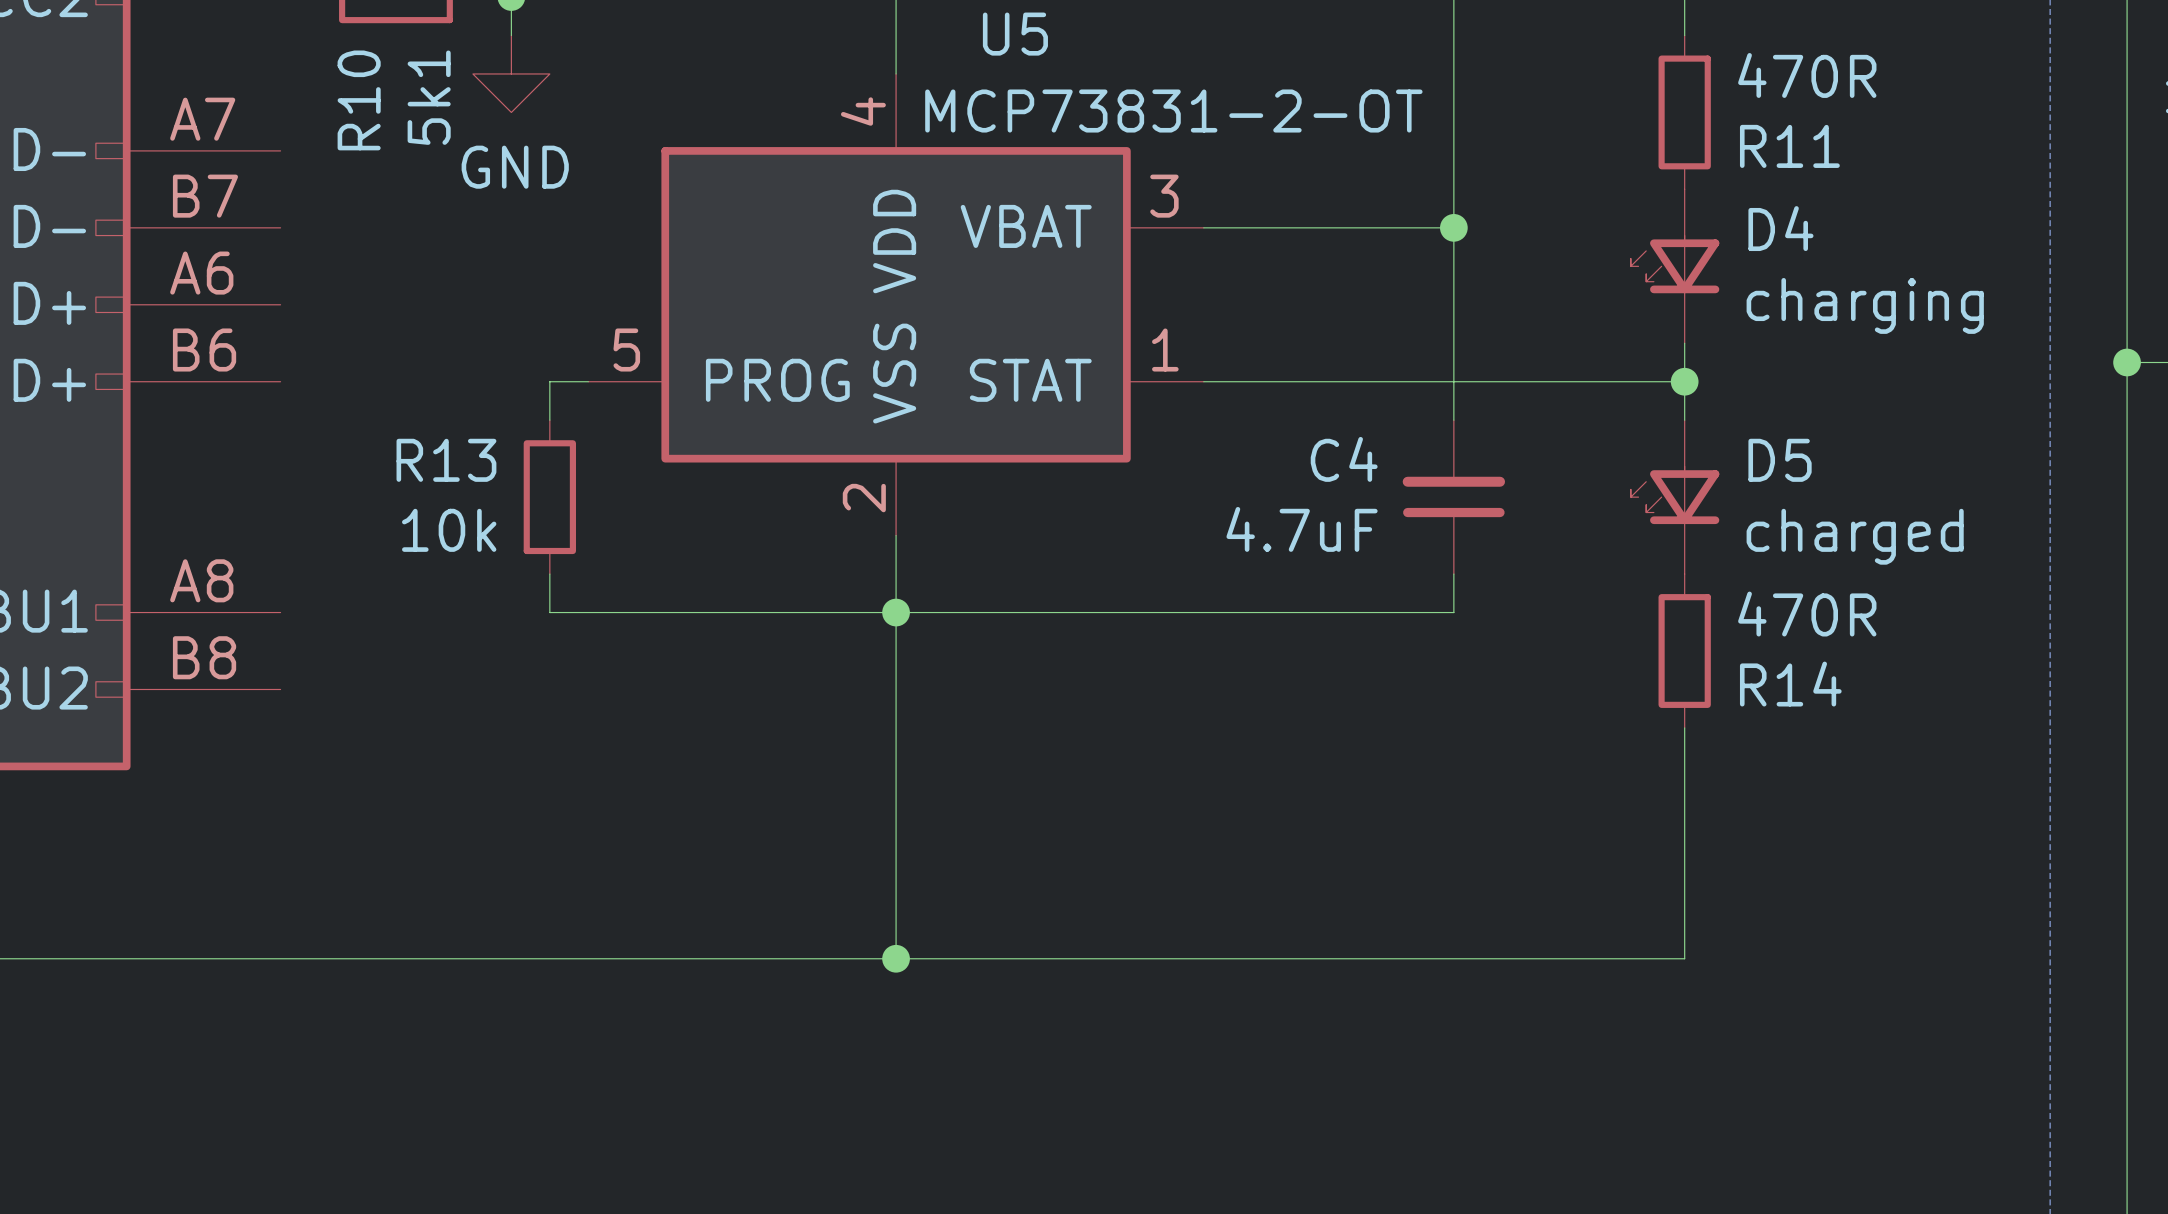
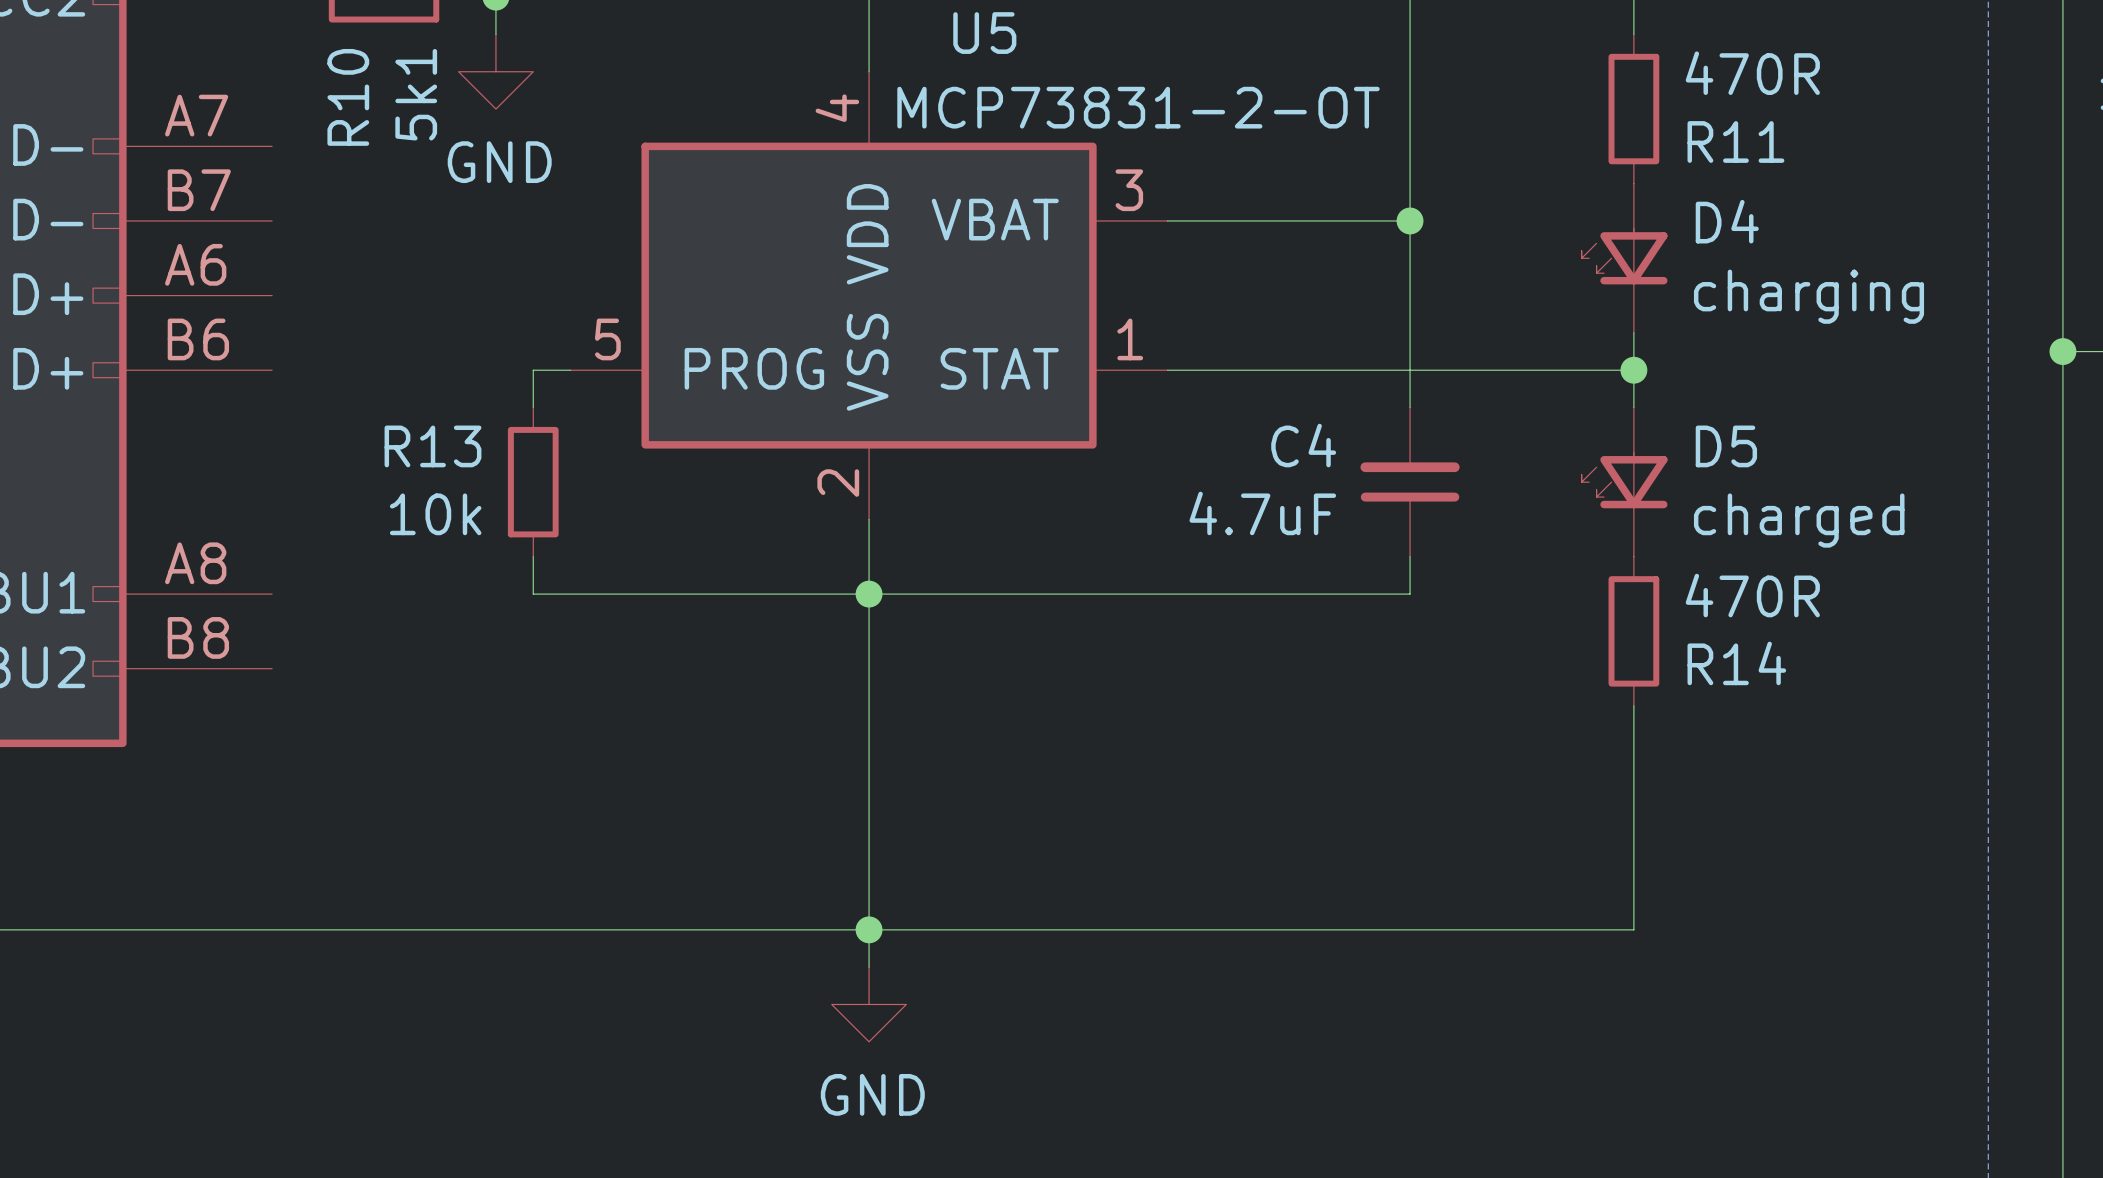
wire: none -> (869, 929) (869, 967)
power symbol: none -> GND (869, 1004)

